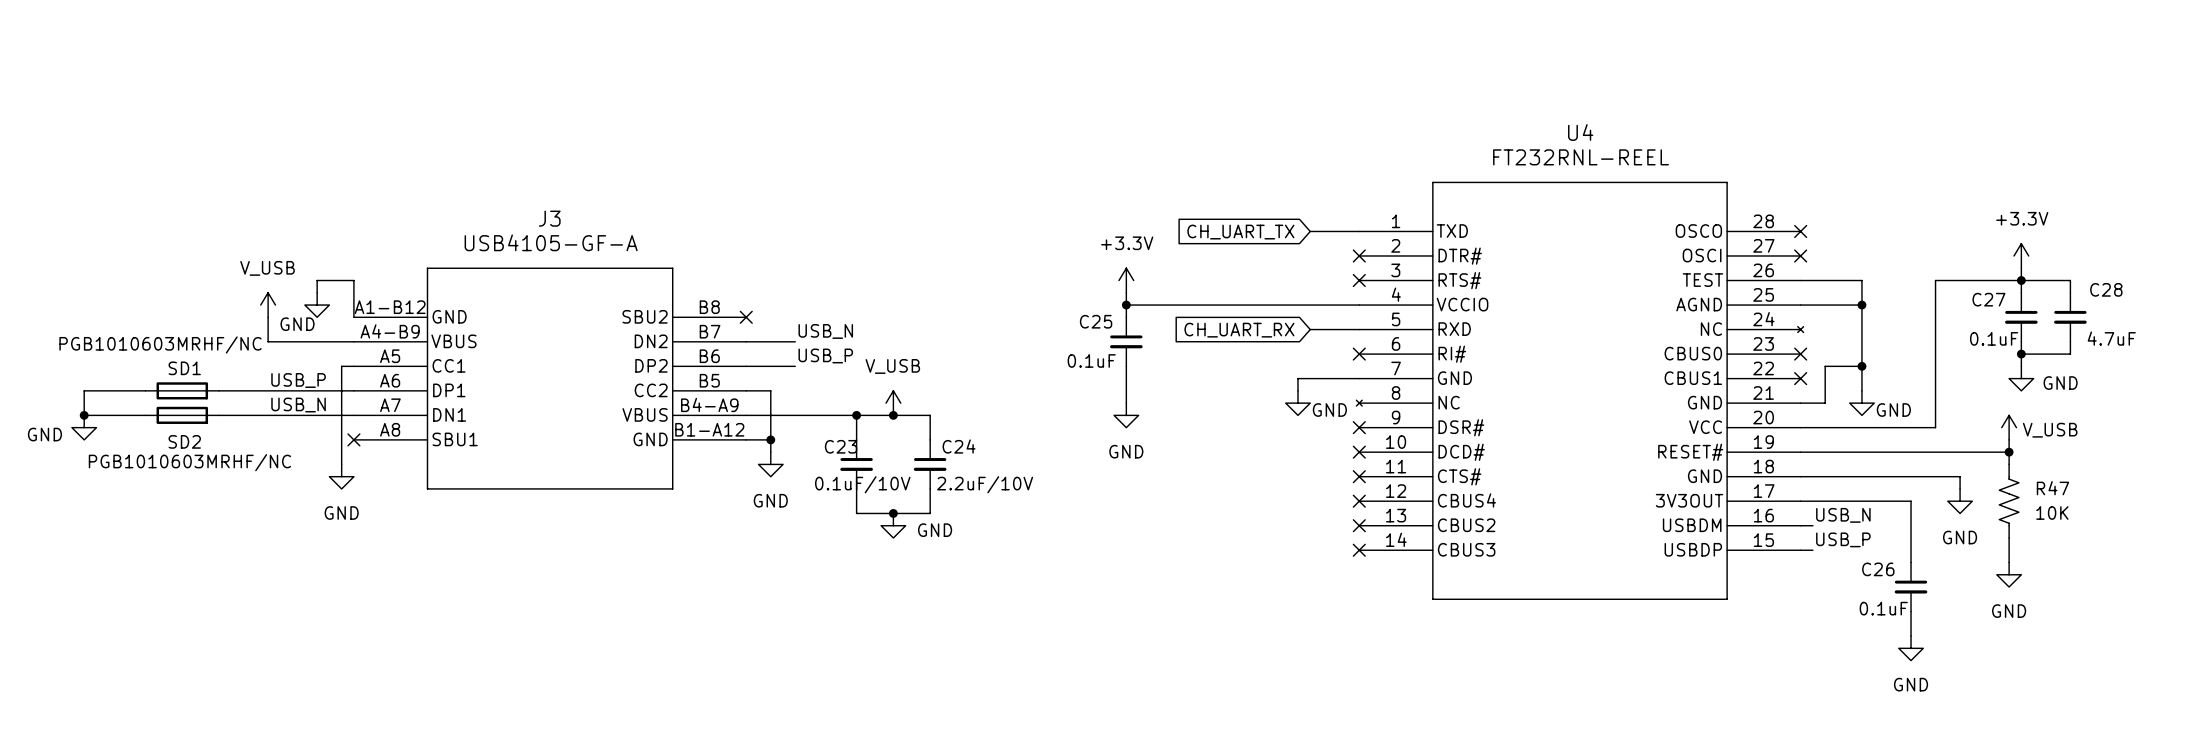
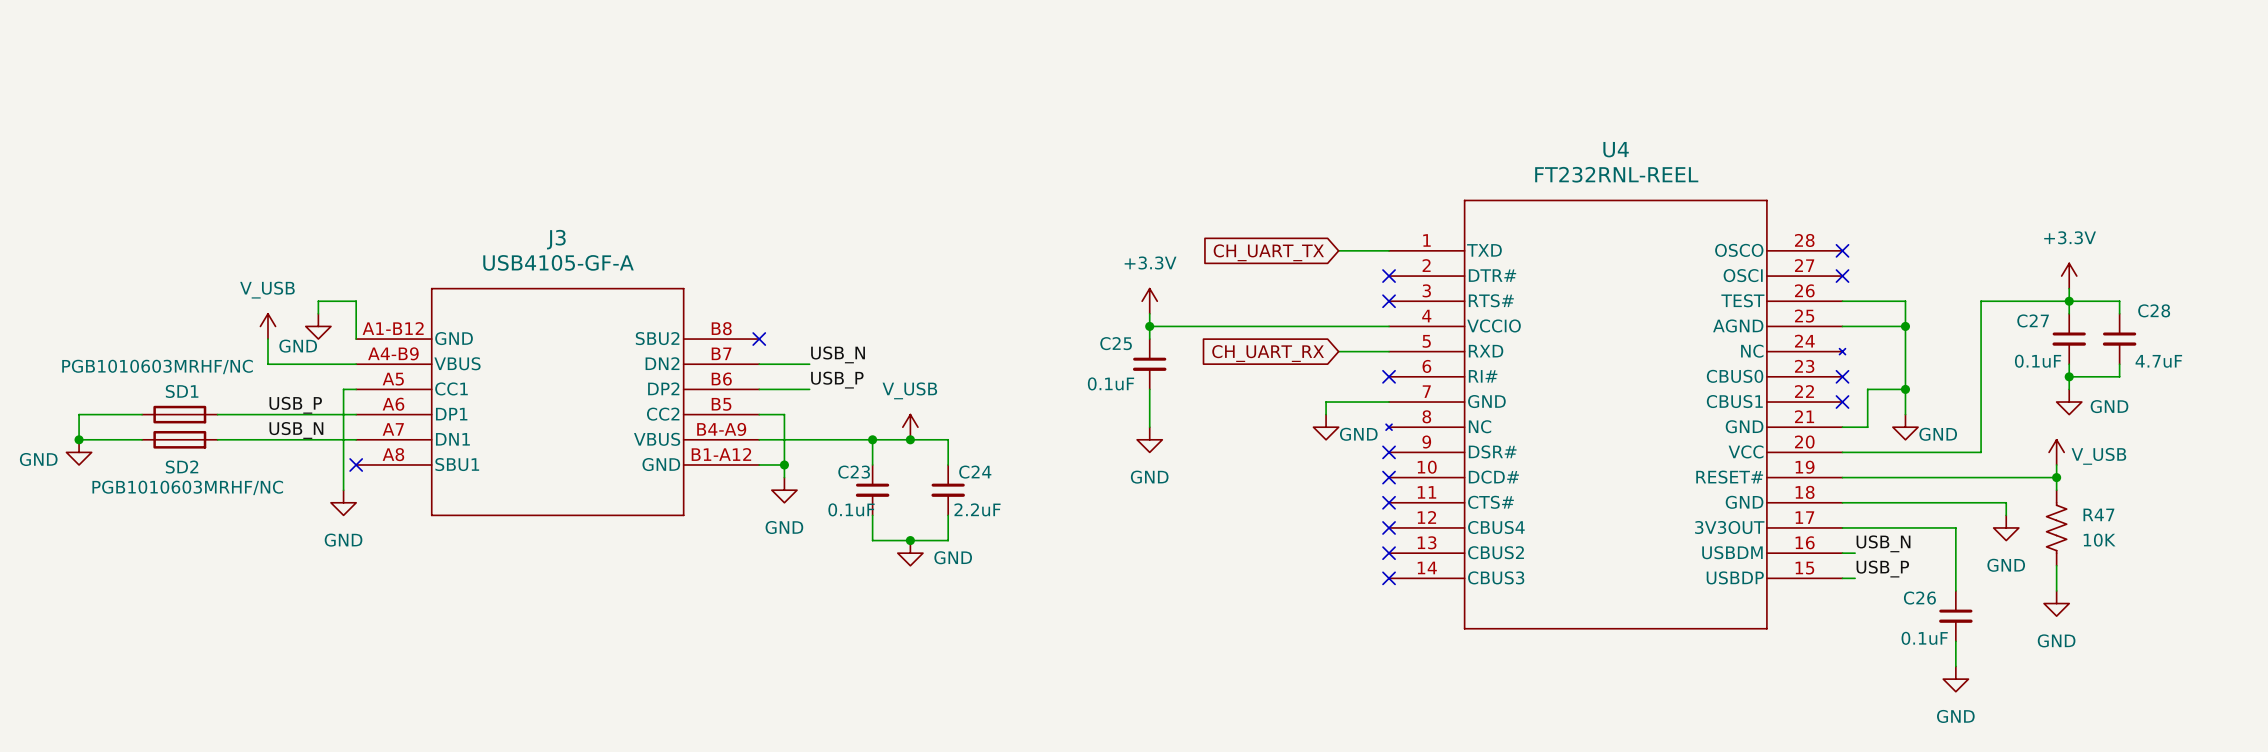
C23 value: 0.1uF/10V (862, 484) -> 0.1uF (851, 509)
C24 value: 2.2uF/10V (985, 484) -> 2.2uF (977, 509)

